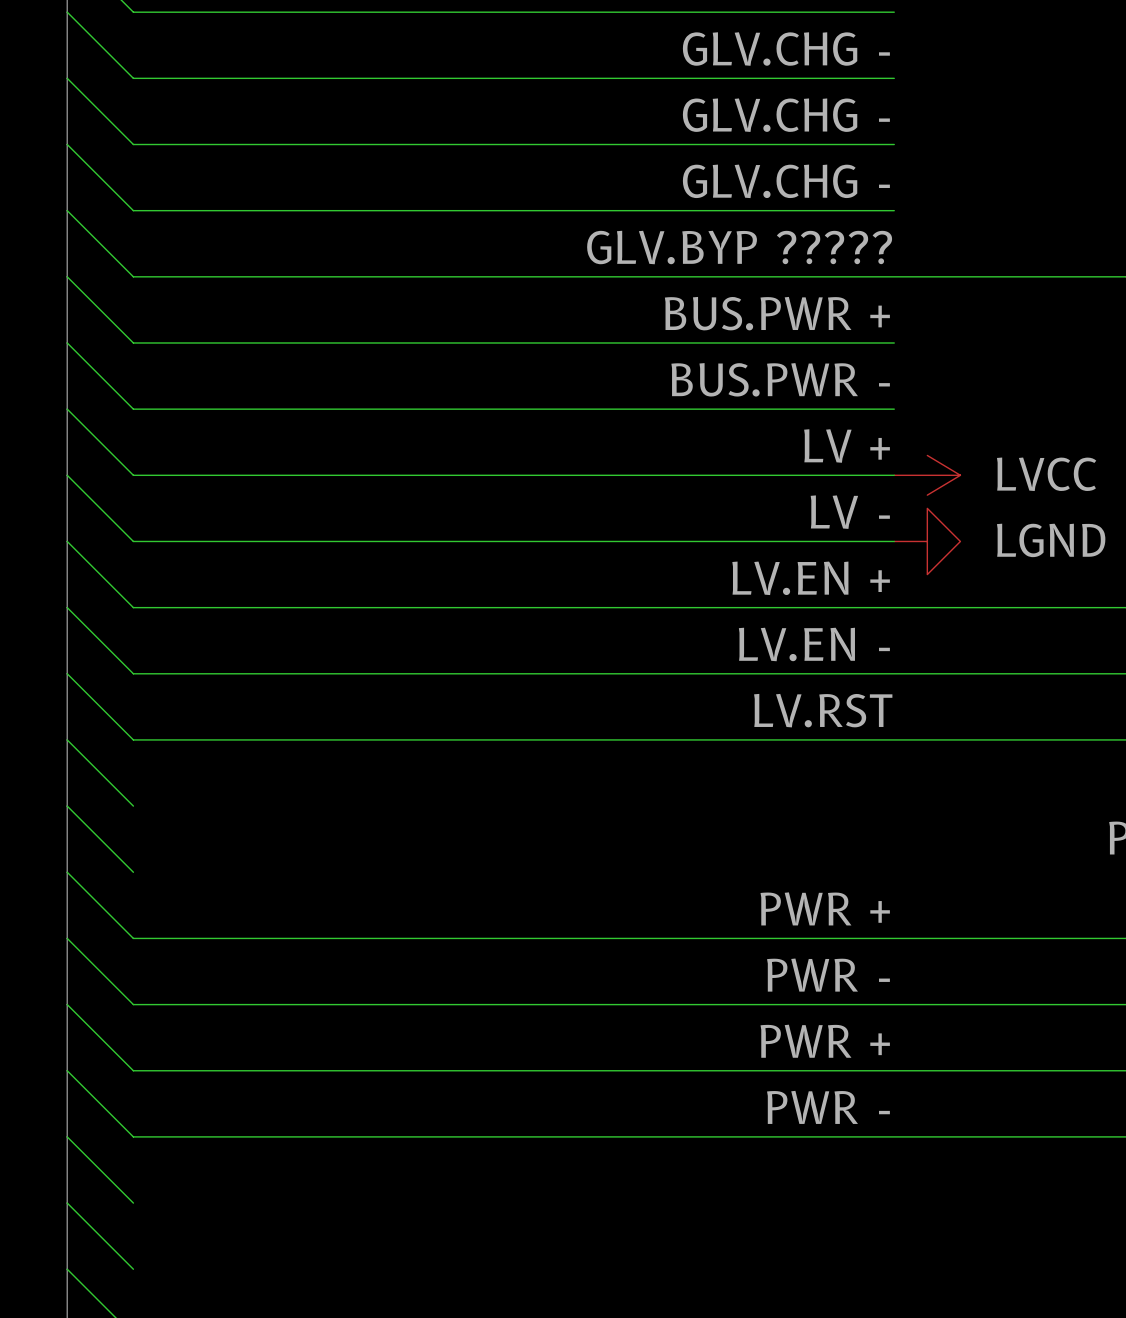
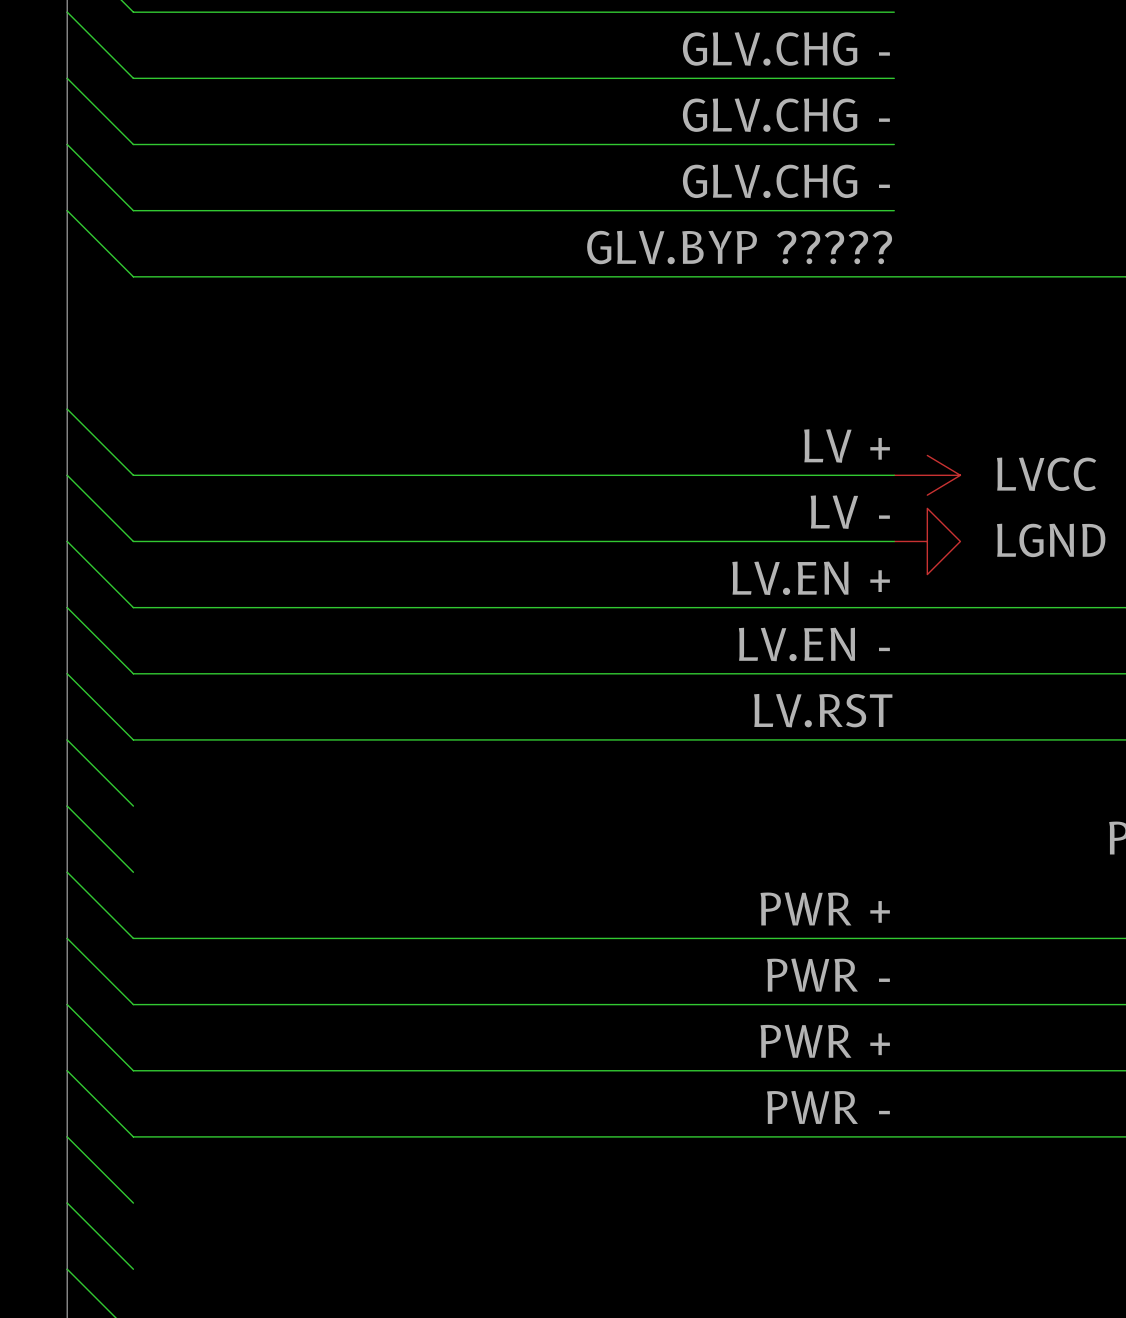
wire: (67, 276) (133, 342) (894, 342) -> none
label: BUS.PWR + (777, 313) -> none
wire: (67, 342) (133, 409) (894, 409) -> none
label: BUS.PWR - (780, 379) -> none

